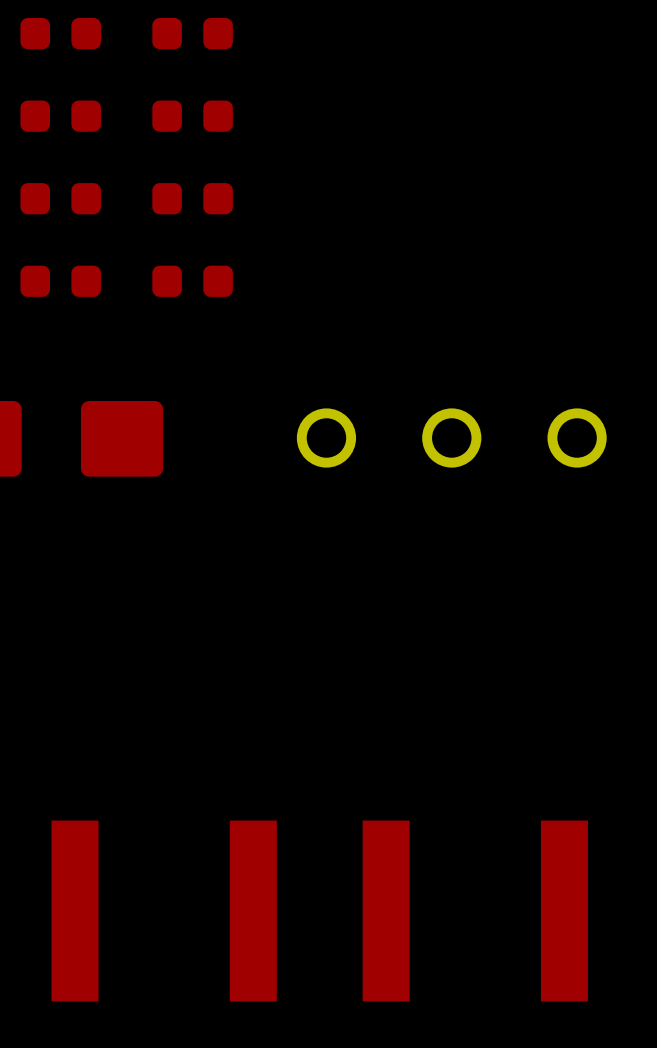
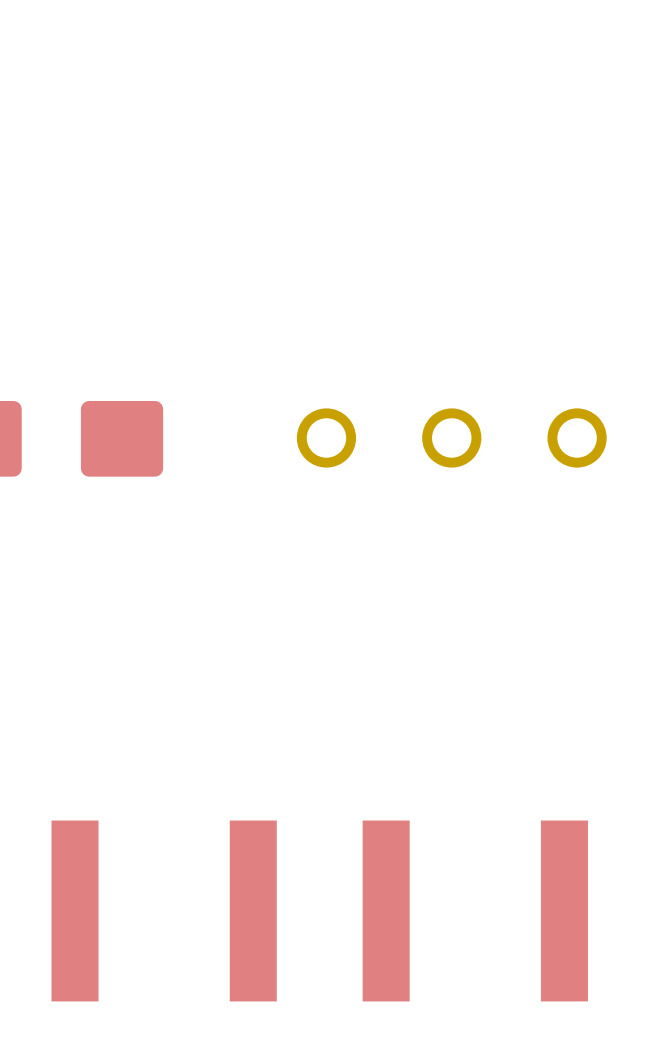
part: (60, 33) -> none
part: (192, 33) -> none
part: (60, 116) -> none
part: (192, 116) -> none
part: (60, 198) -> none
part: (192, 198) -> none
part: (60, 281) -> none
part: (192, 281) -> none

